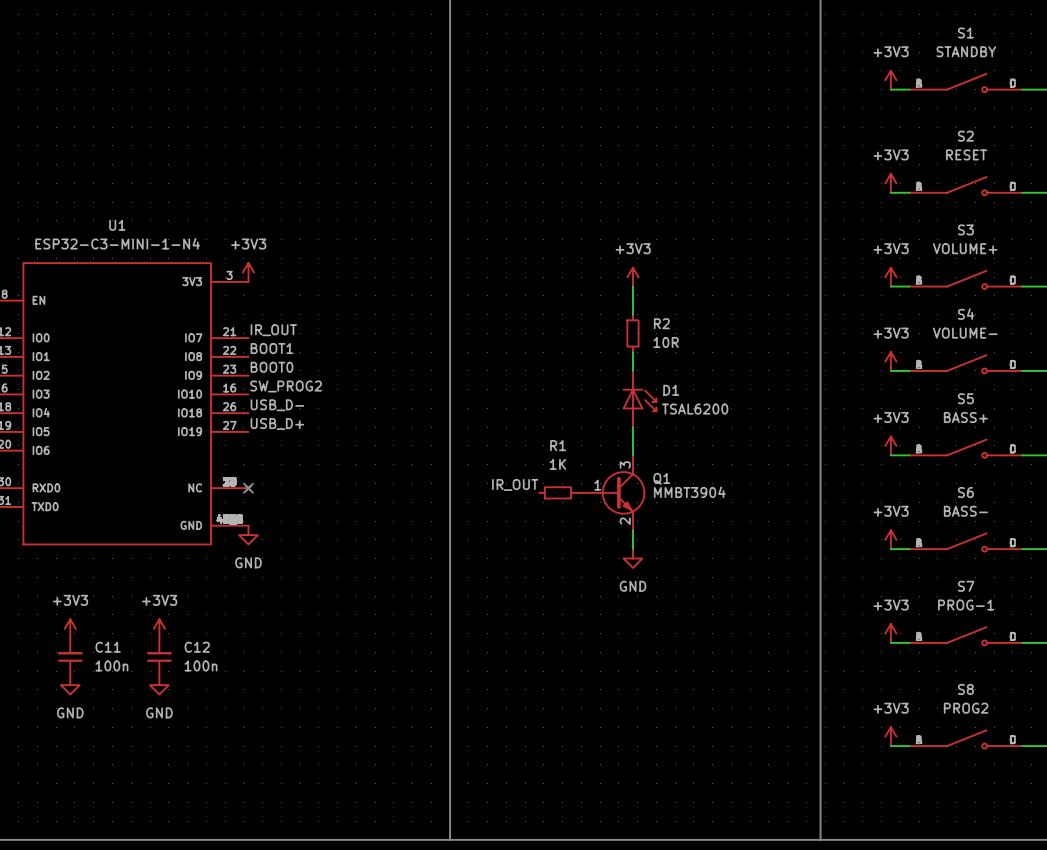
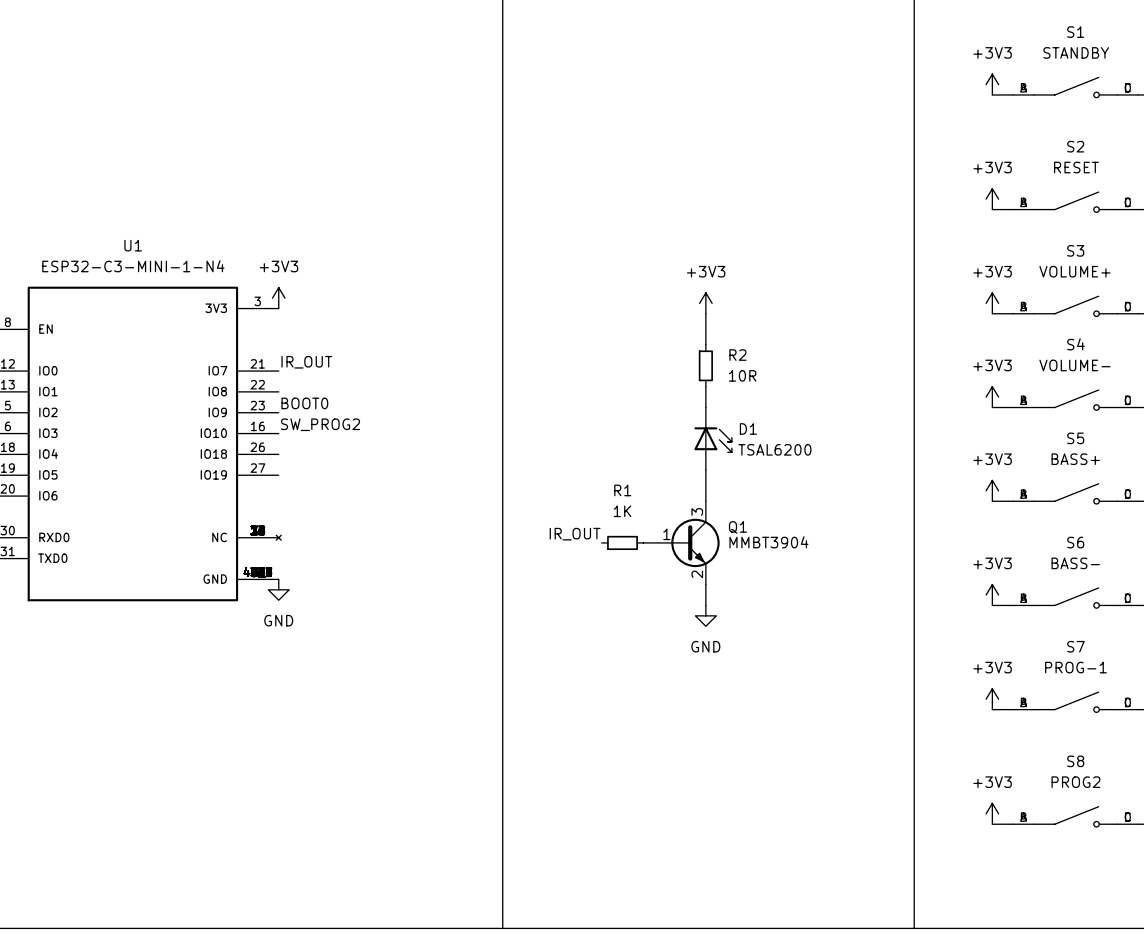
label: BOOT1 (271, 348) -> none
label: USB_D- (277, 405) -> none
label: USB_D+ (277, 423) -> none
no-connect mark: (248, 488) -> none
power symbol: +3V3 (70, 628) -> none
power symbol: +3V3 (159, 628) -> none
C11: 100n (70, 656) -> none
C12: 100n (159, 656) -> none
power symbol: GND (70, 685) -> none
power symbol: GND (159, 685) -> none

